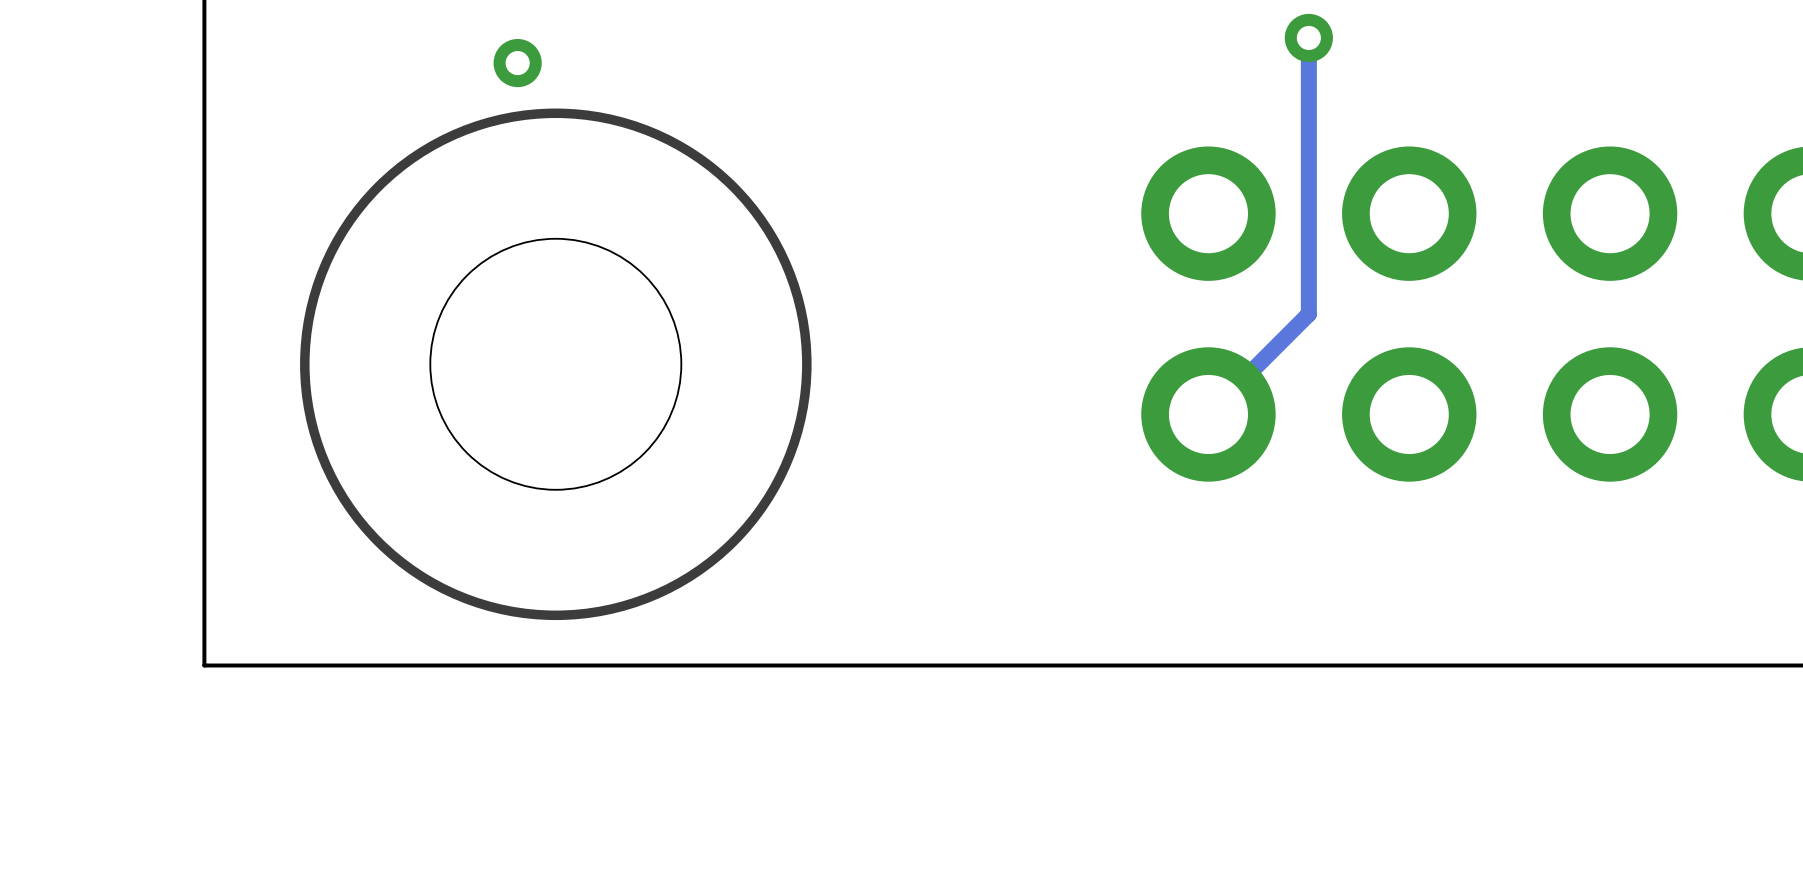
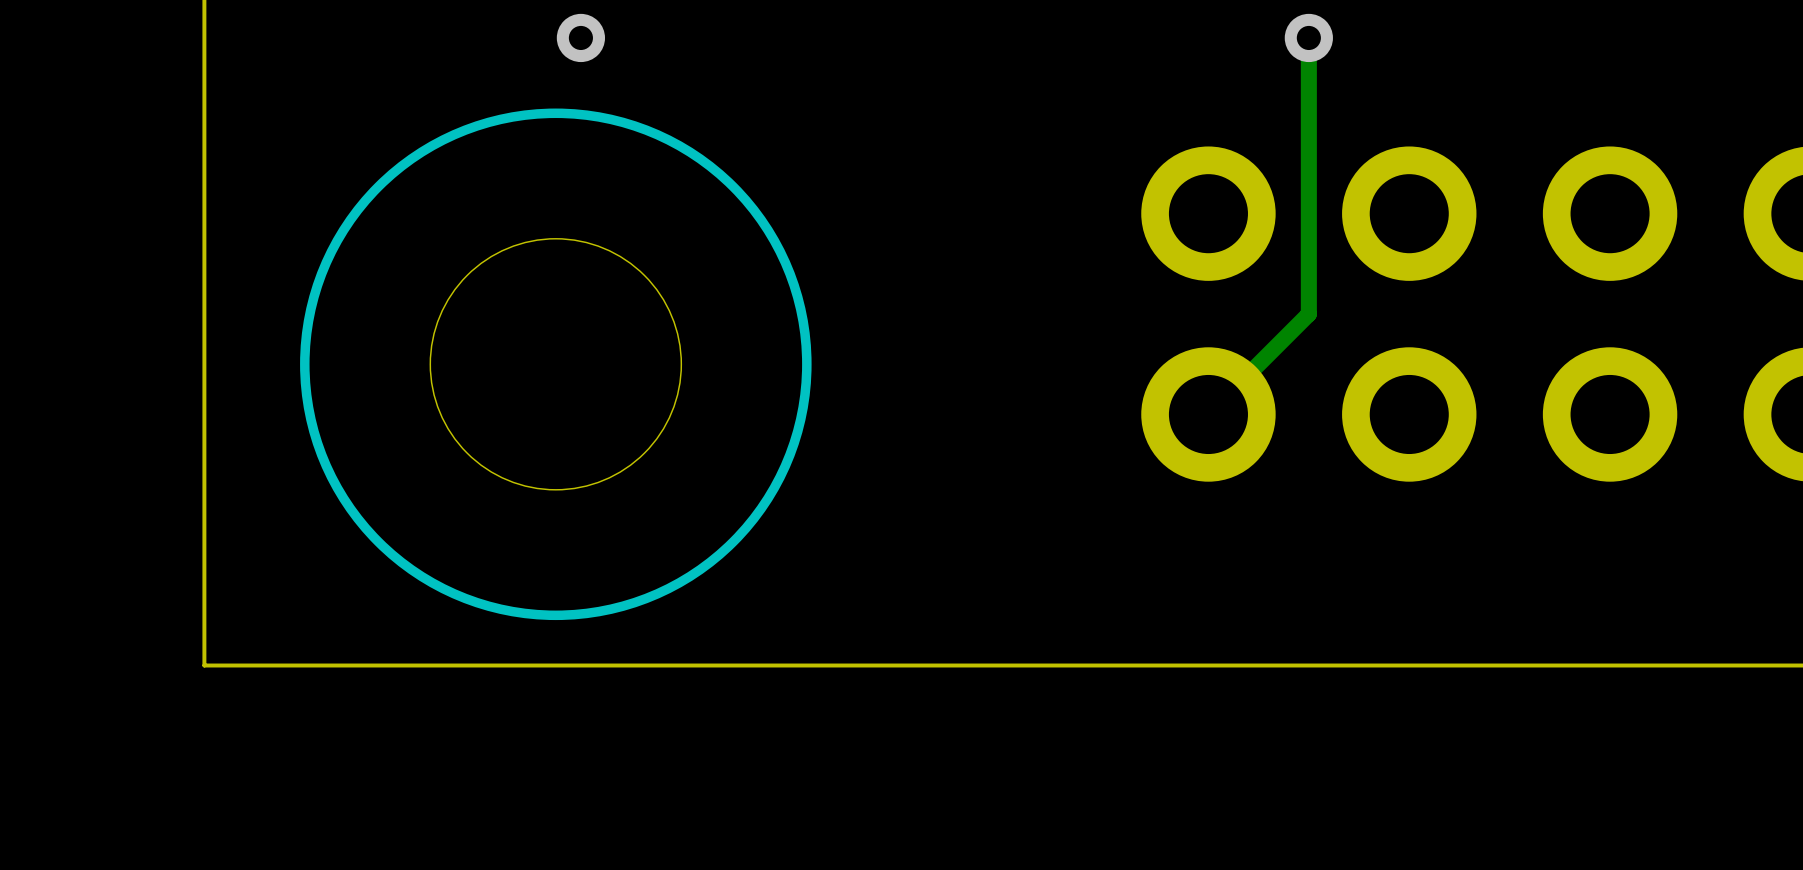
via position: (517, 63) -> (580, 37)

